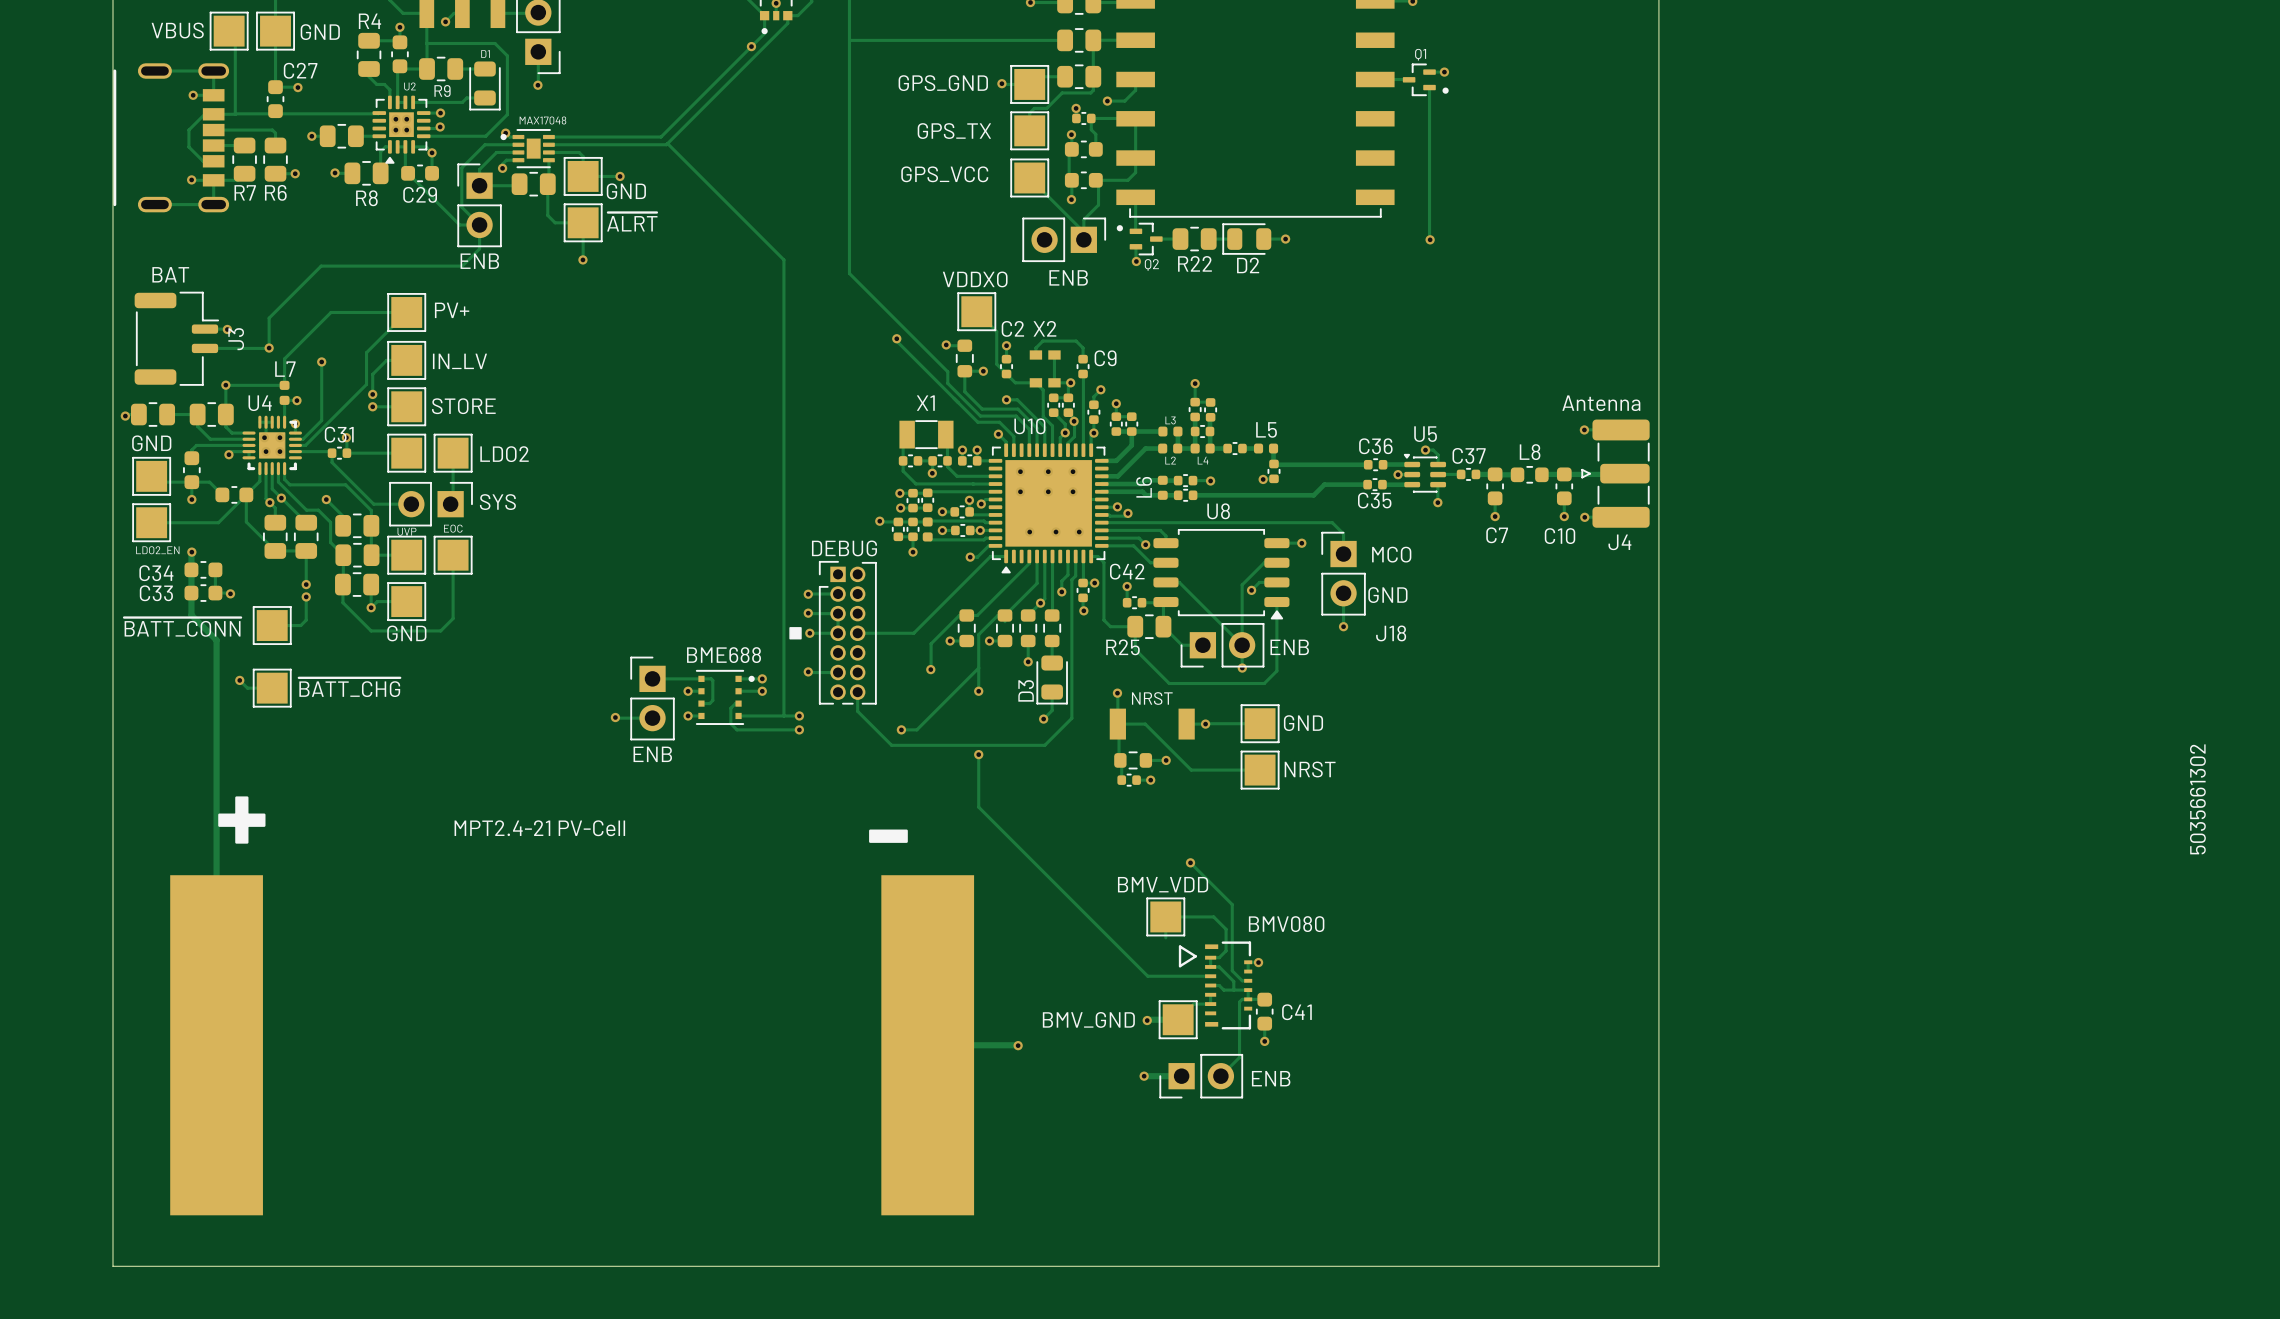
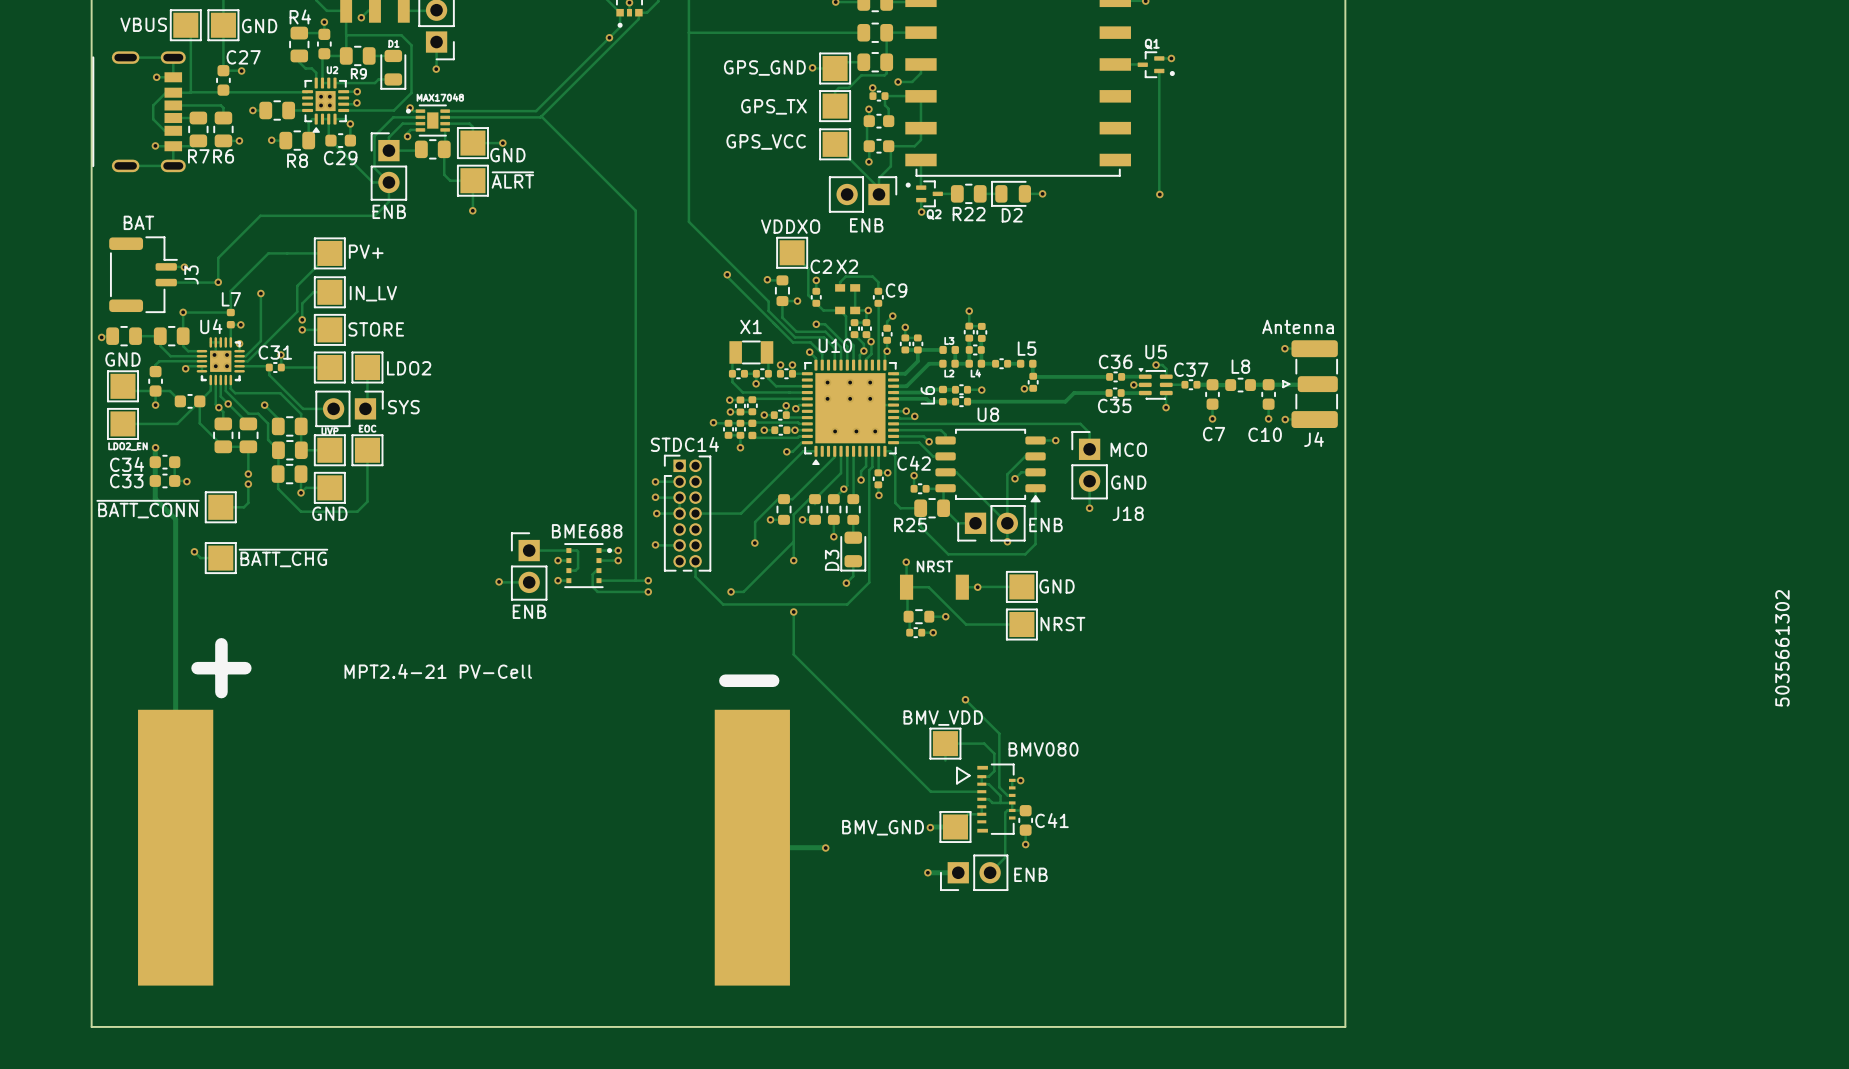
part value: DEBUG (844, 548) -> STDC14 (684, 444)
drawing: [789, 627, 802, 640] -> none

